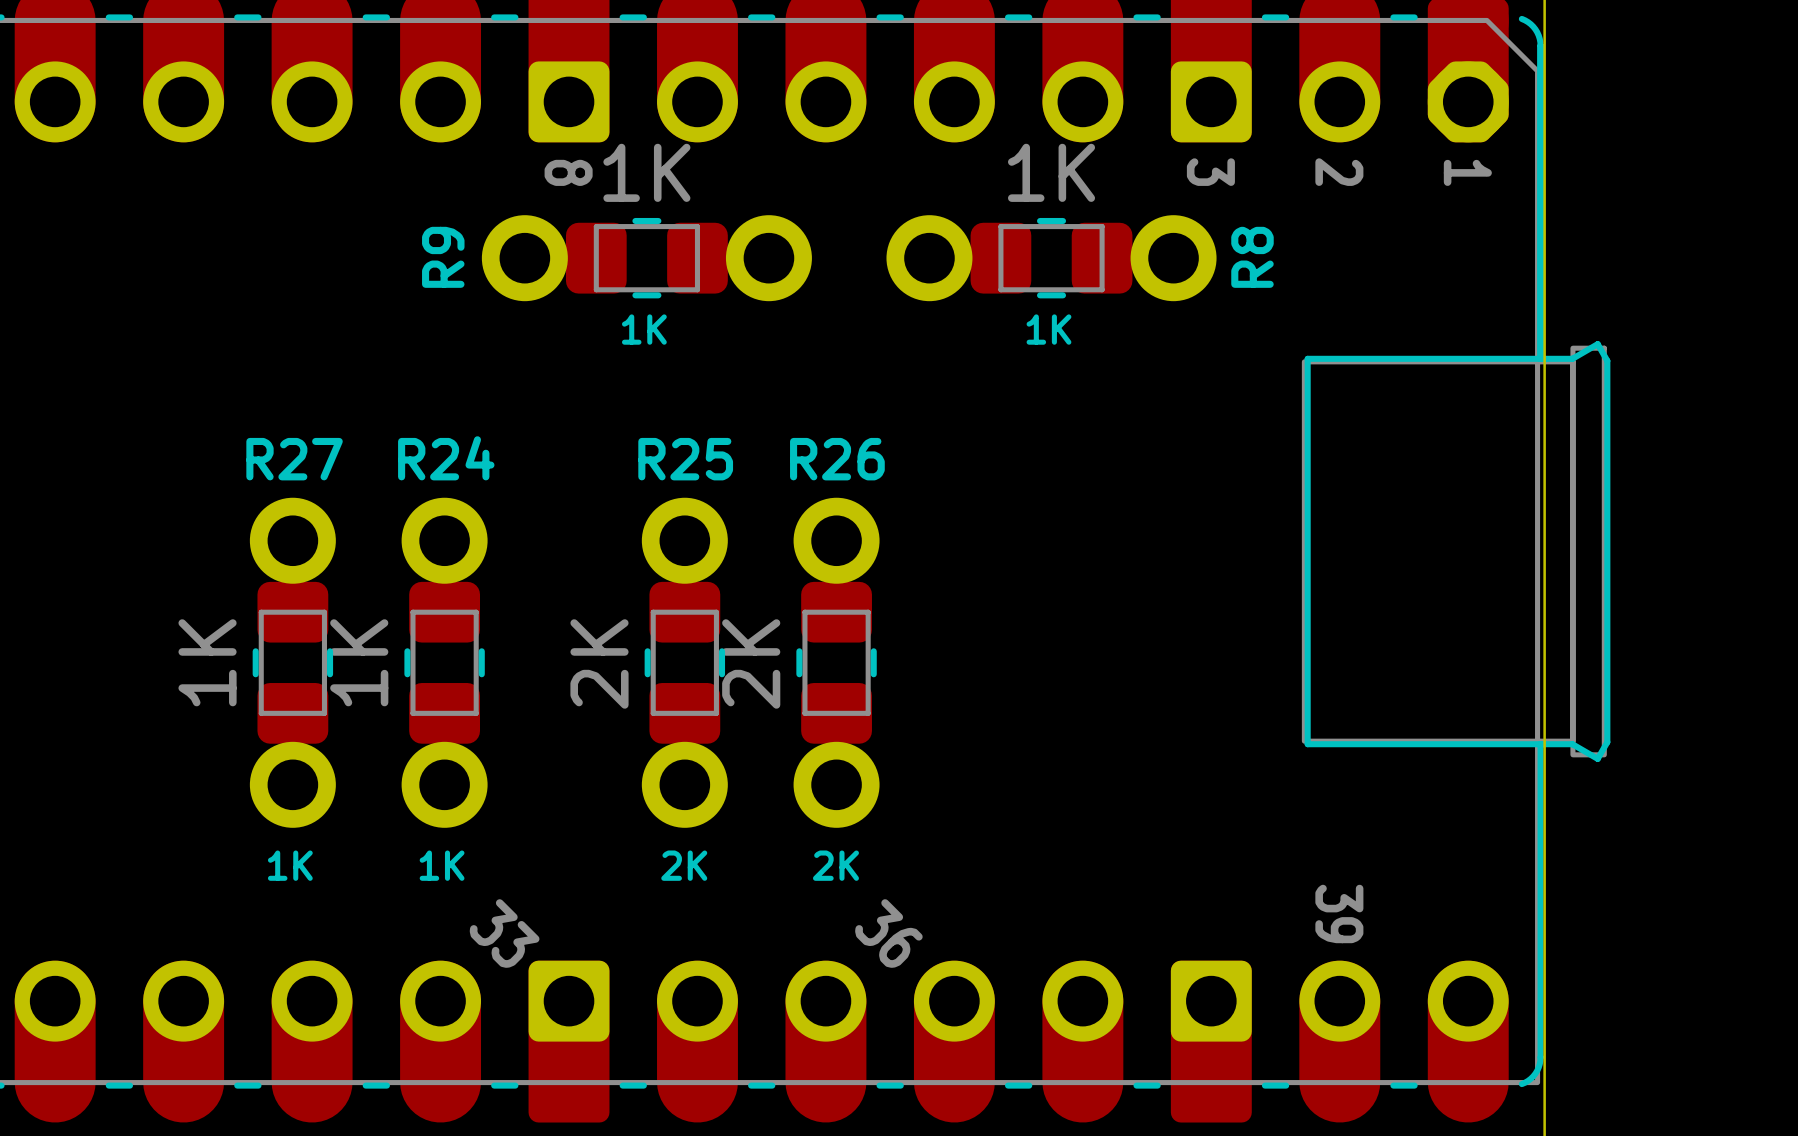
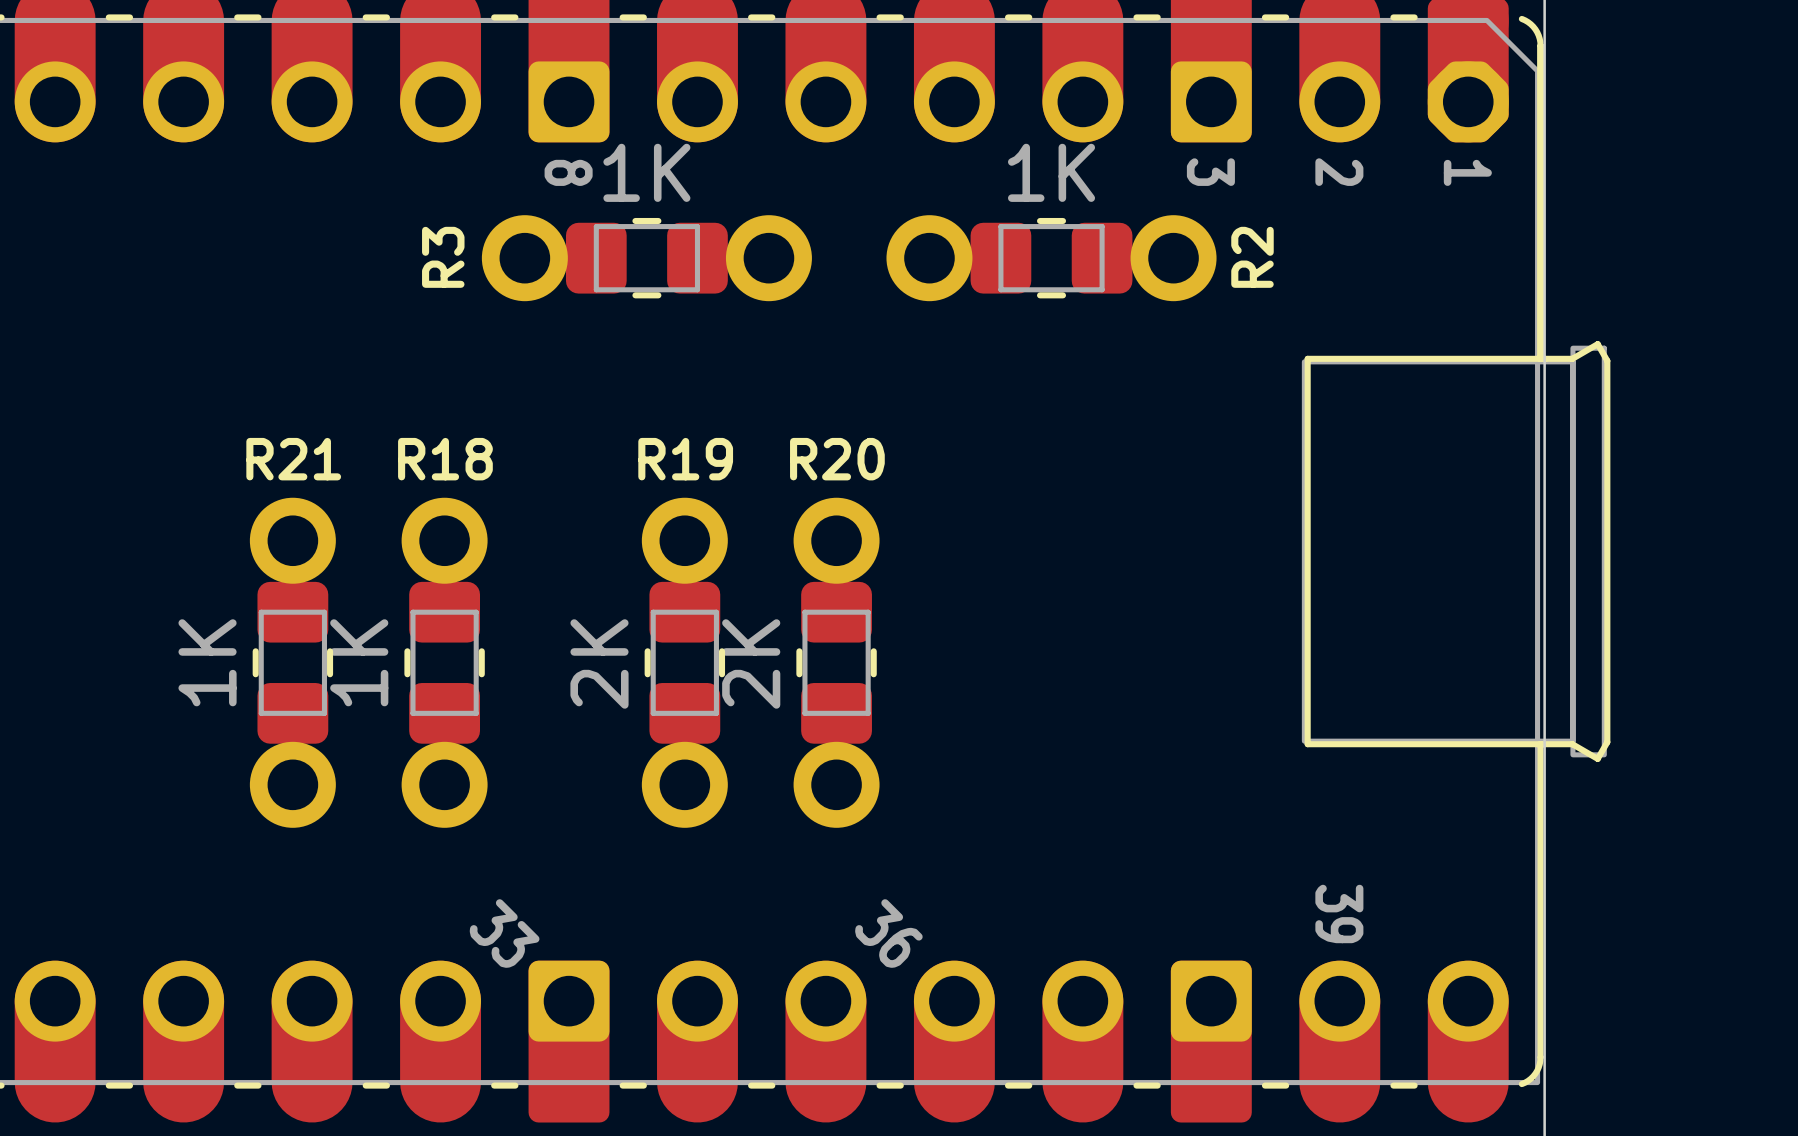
R9 name: R9 (443, 257) -> R3 (443, 257)
R8 name: R8 (1252, 257) -> R2 (1252, 257)
text: 1K (644, 329) -> none
text: 1K (1048, 329) -> none
R24 name: R24 (446, 458) -> R18 (445, 459)
R27 name: R27 (294, 459) -> R21 (293, 459)
R25 name: R25 (685, 459) -> R19 (685, 459)
R26 name: R26 (837, 459) -> R20 (837, 459)
text: 1K (290, 865) -> none
text: 1K (442, 865) -> none
text: 2K (684, 865) -> none
text: 2K (835, 865) -> none

